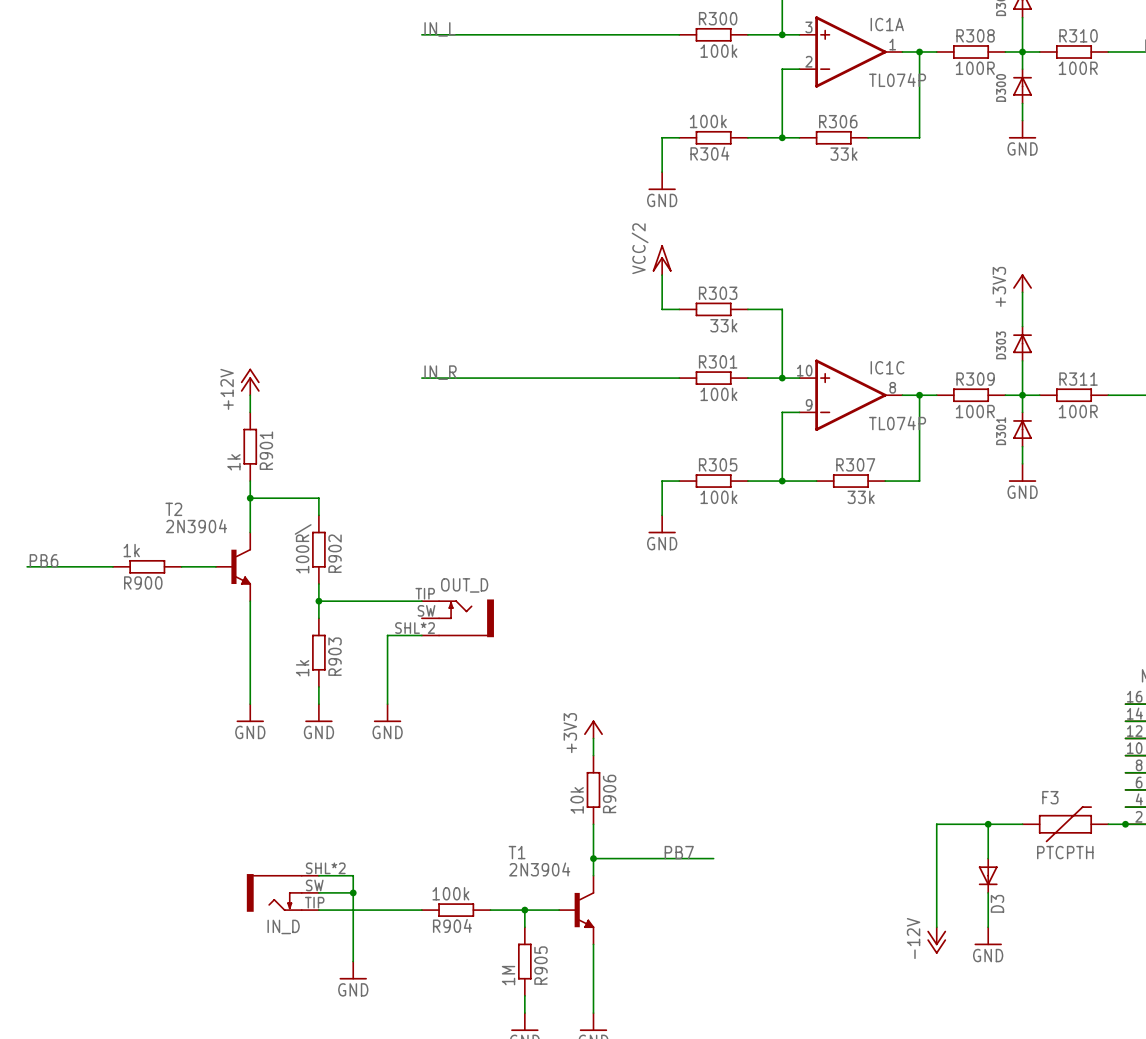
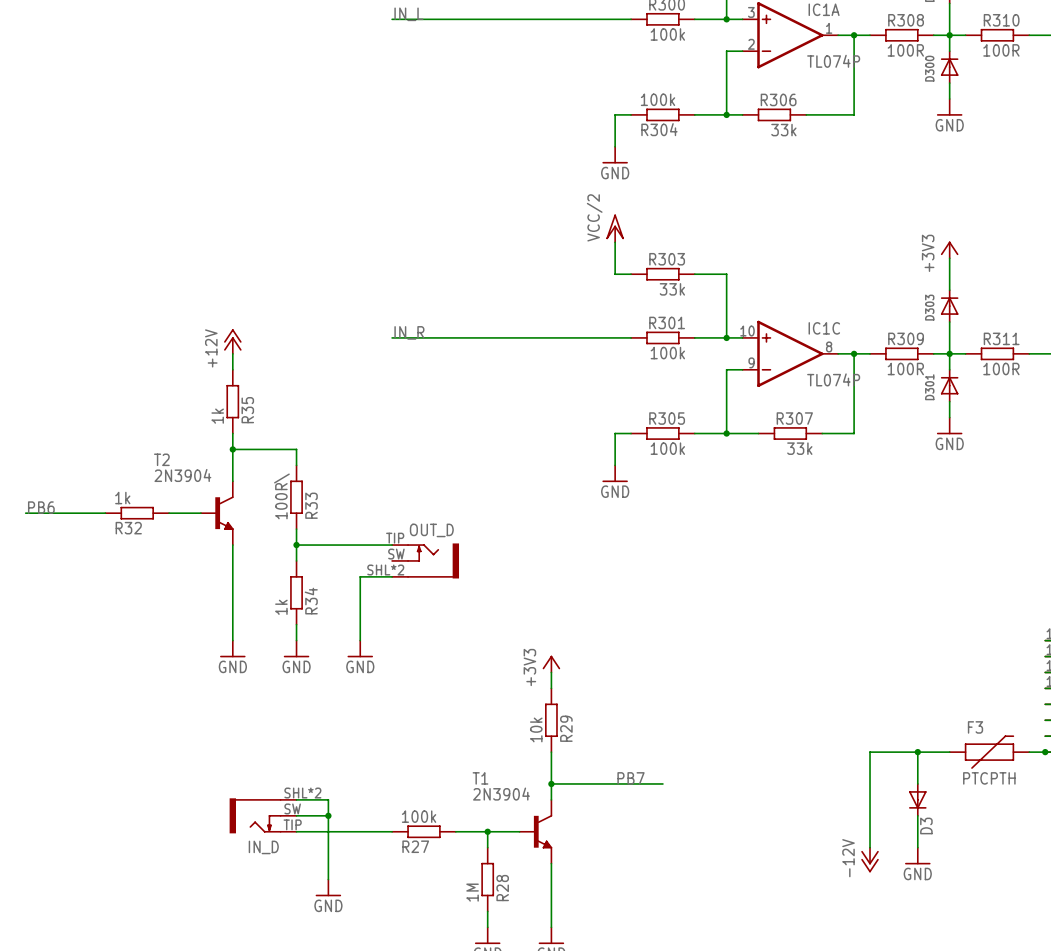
R901 name: R901 (266, 450) -> R35 (247, 410)
R902 name: R902 (335, 553) -> R33 (311, 505)
R900 name: R900 (143, 582) -> R32 (128, 528)
R903 name: R903 (335, 656) -> R34 (311, 601)
R906 name: R906 (609, 793) -> R29 (566, 728)
R904 name: R904 (452, 925) -> R27 (415, 846)
R905 name: R905 (540, 965) -> R28 (502, 888)

